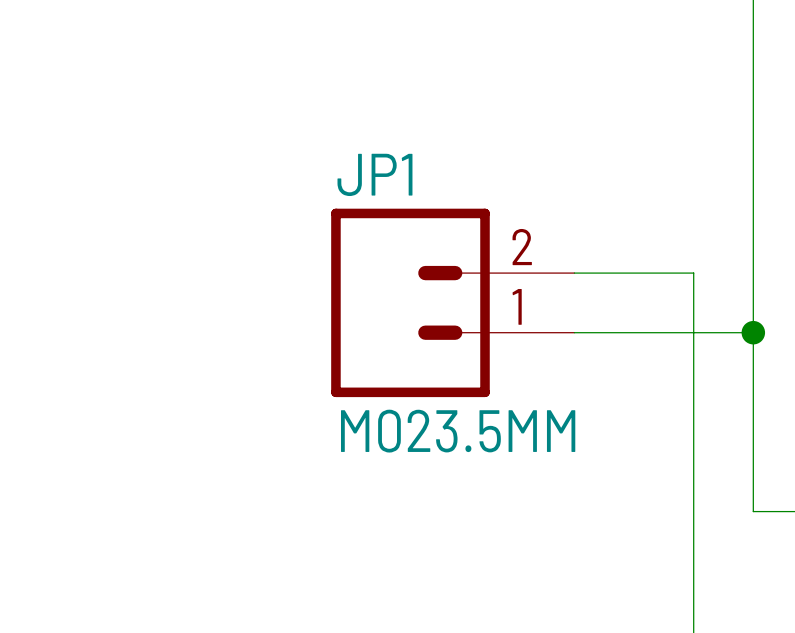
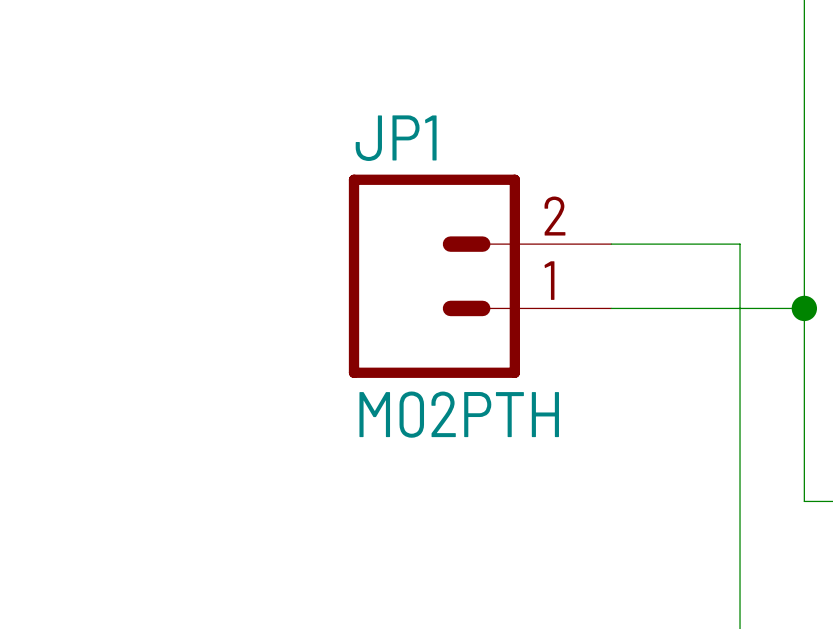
JP1 value: M023.5MM (458, 431) -> M02PTH (459, 414)

